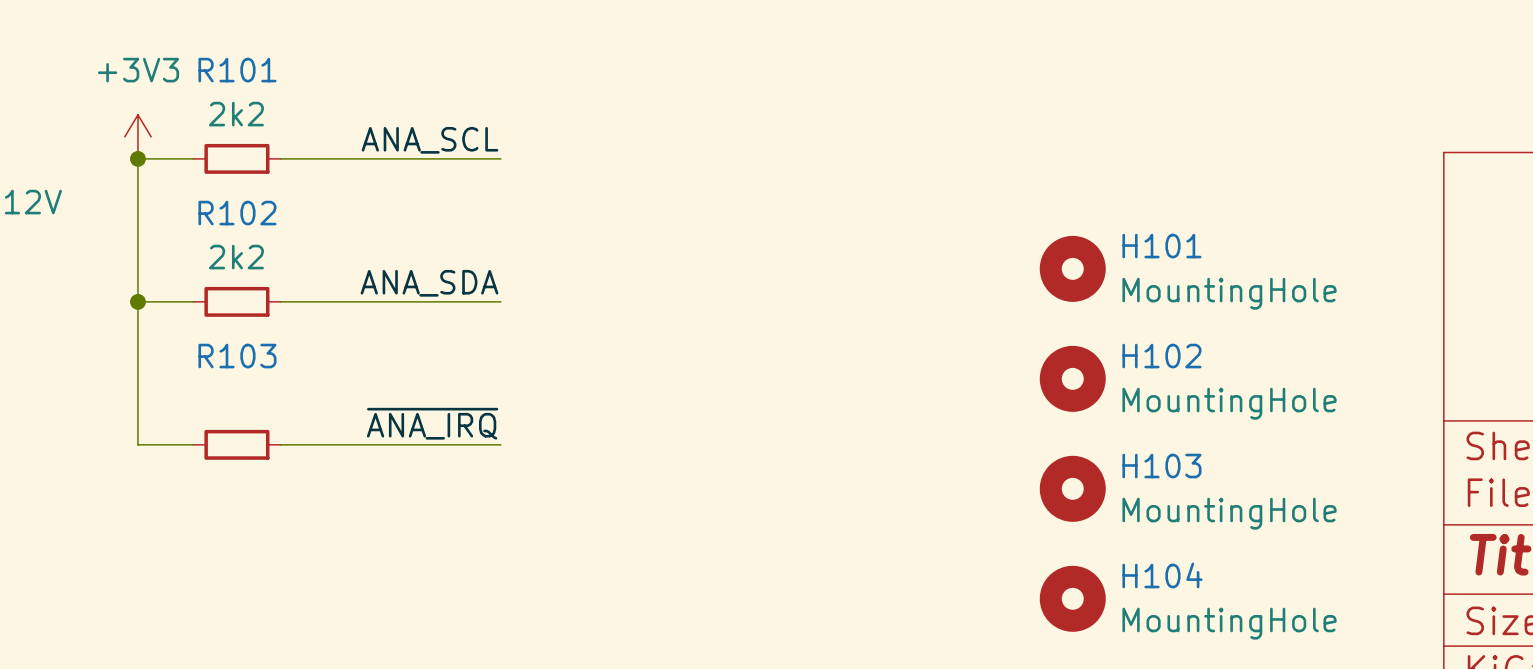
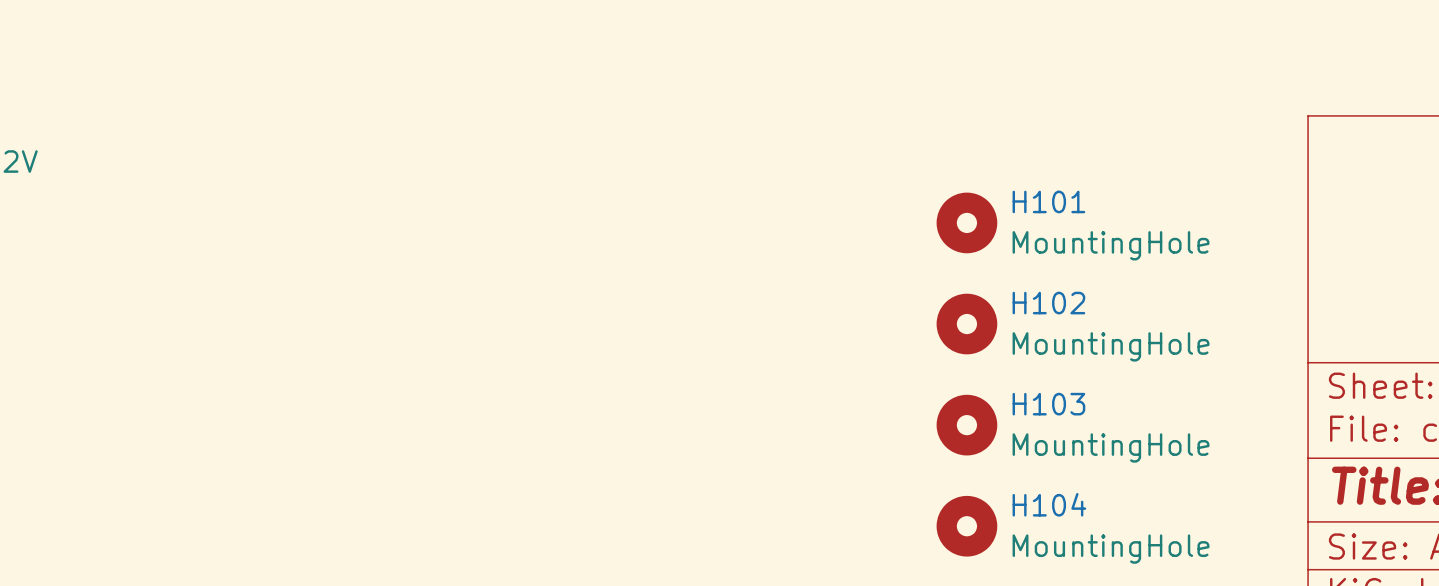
power symbol: +3V3 (137, 136) -> none
label: ANA_SCL (430, 140) -> none
junction: (137, 158) -> none
wire: (192, 158) (137, 158) (137, 444) (192, 444) -> none
R101: 2k2 (236, 158) -> none
wire: (280, 158) (500, 158) -> none
label: ANA_SDA (429, 283) -> none
wire: (137, 301) (192, 301) -> none
junction: (137, 301) -> none
R102: 2k2 (236, 301) -> none
wire: (280, 301) (500, 301) -> none
label: ~{ANA_IRQ} (432, 423) -> none
R103: (236, 444) -> none
wire: (280, 444) (500, 444) -> none

